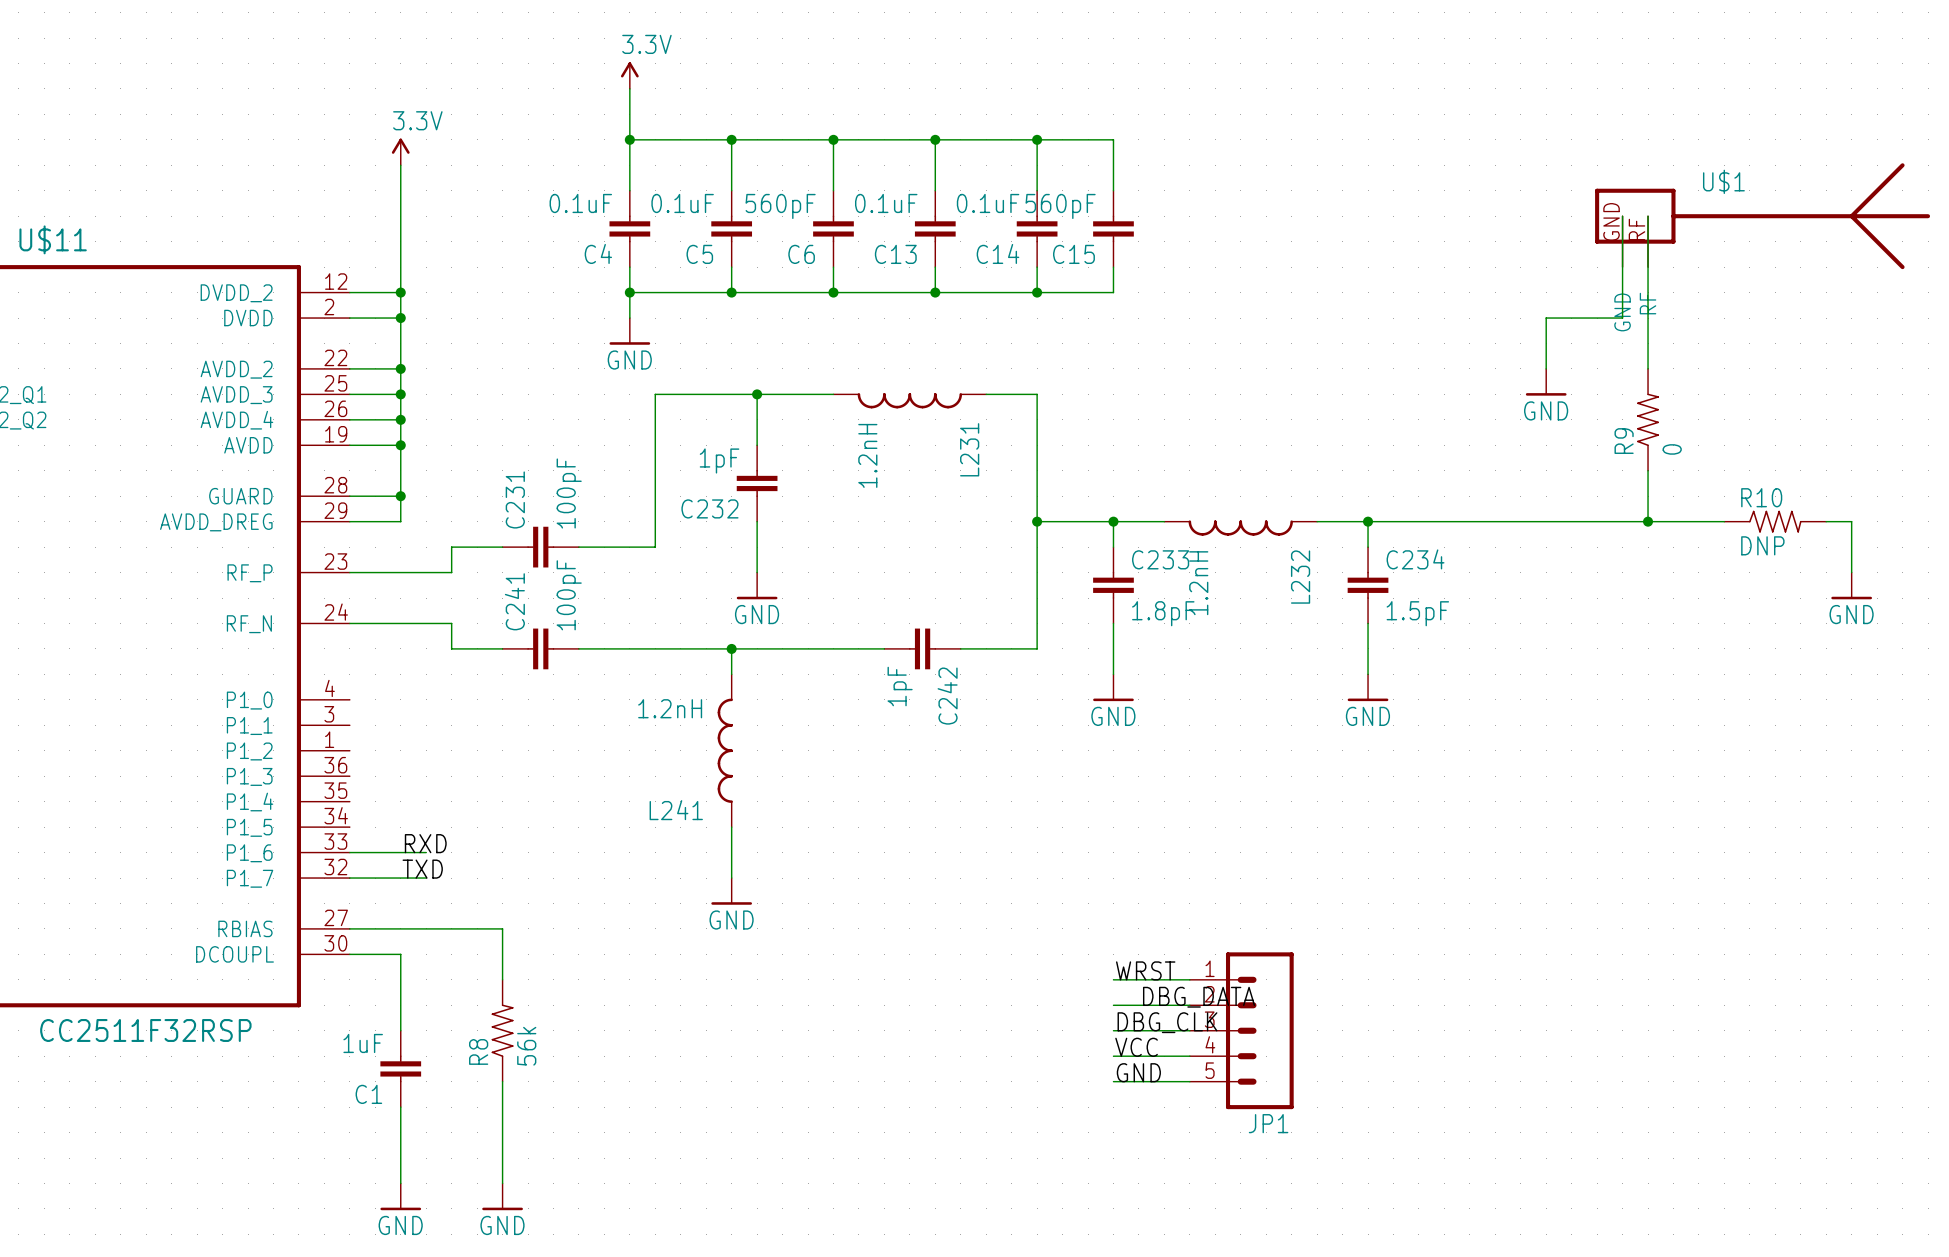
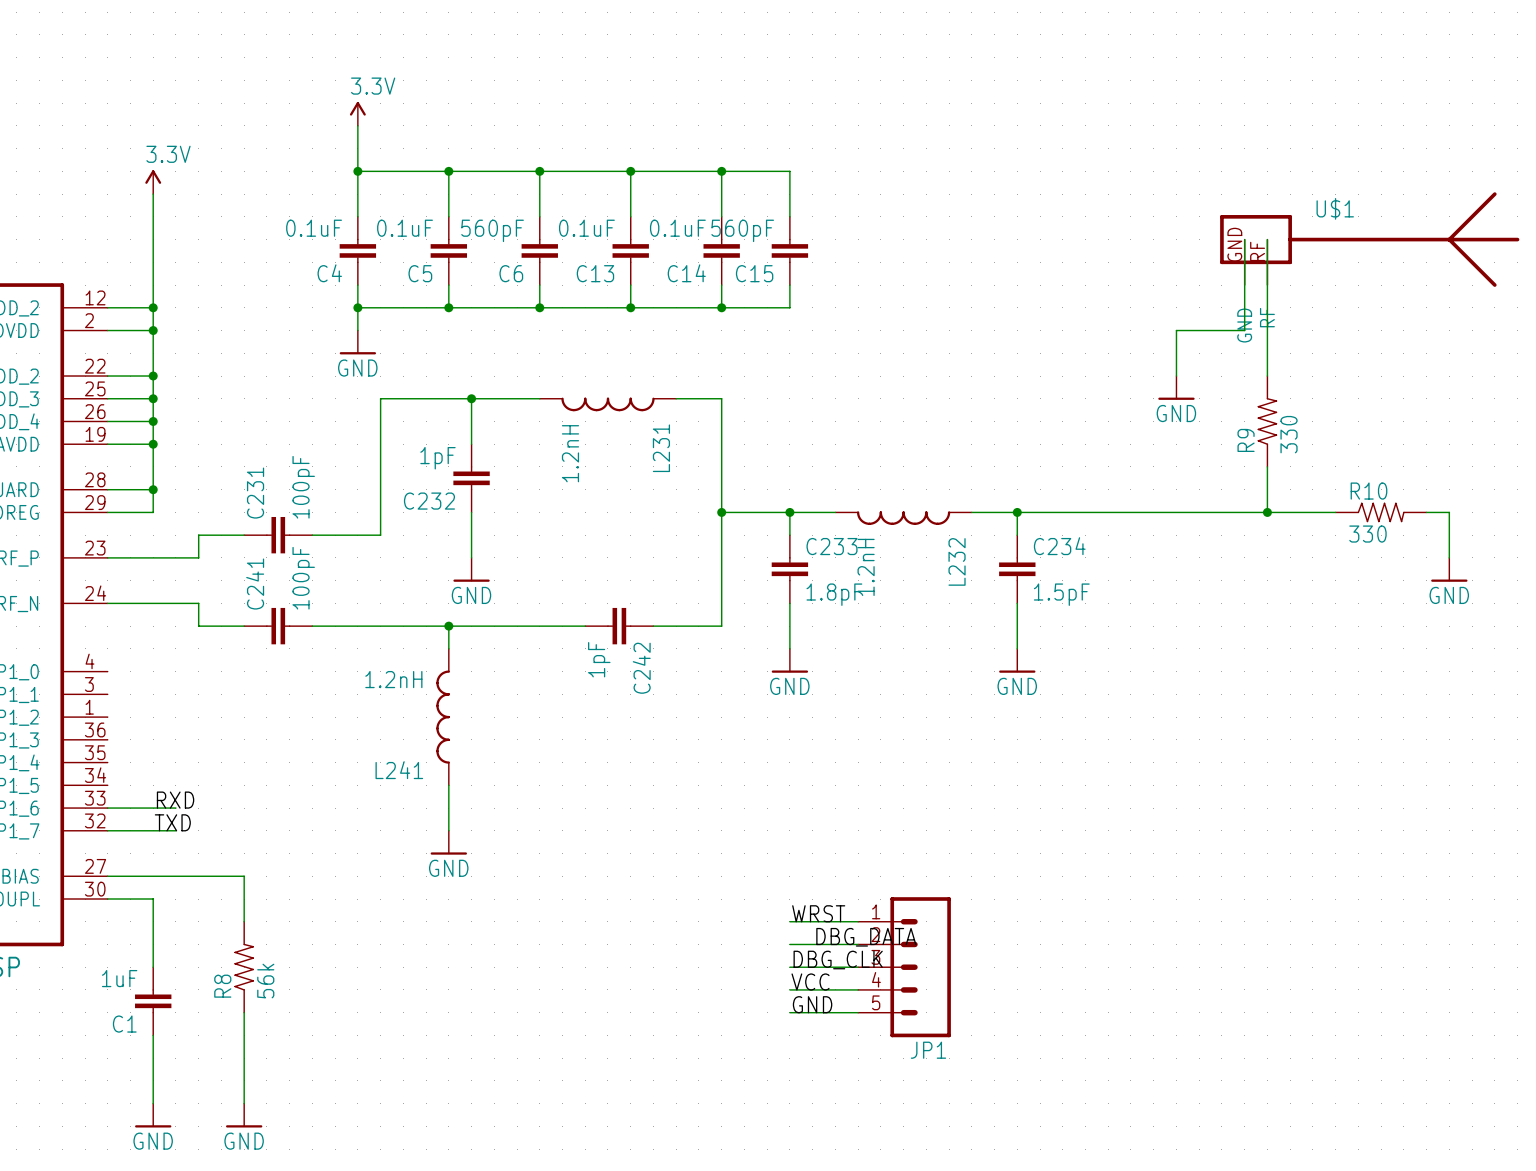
R9 value: 0 (1672, 449) -> 330 (1289, 434)
R10 value: DNP (1762, 545) -> 330 (1367, 534)

